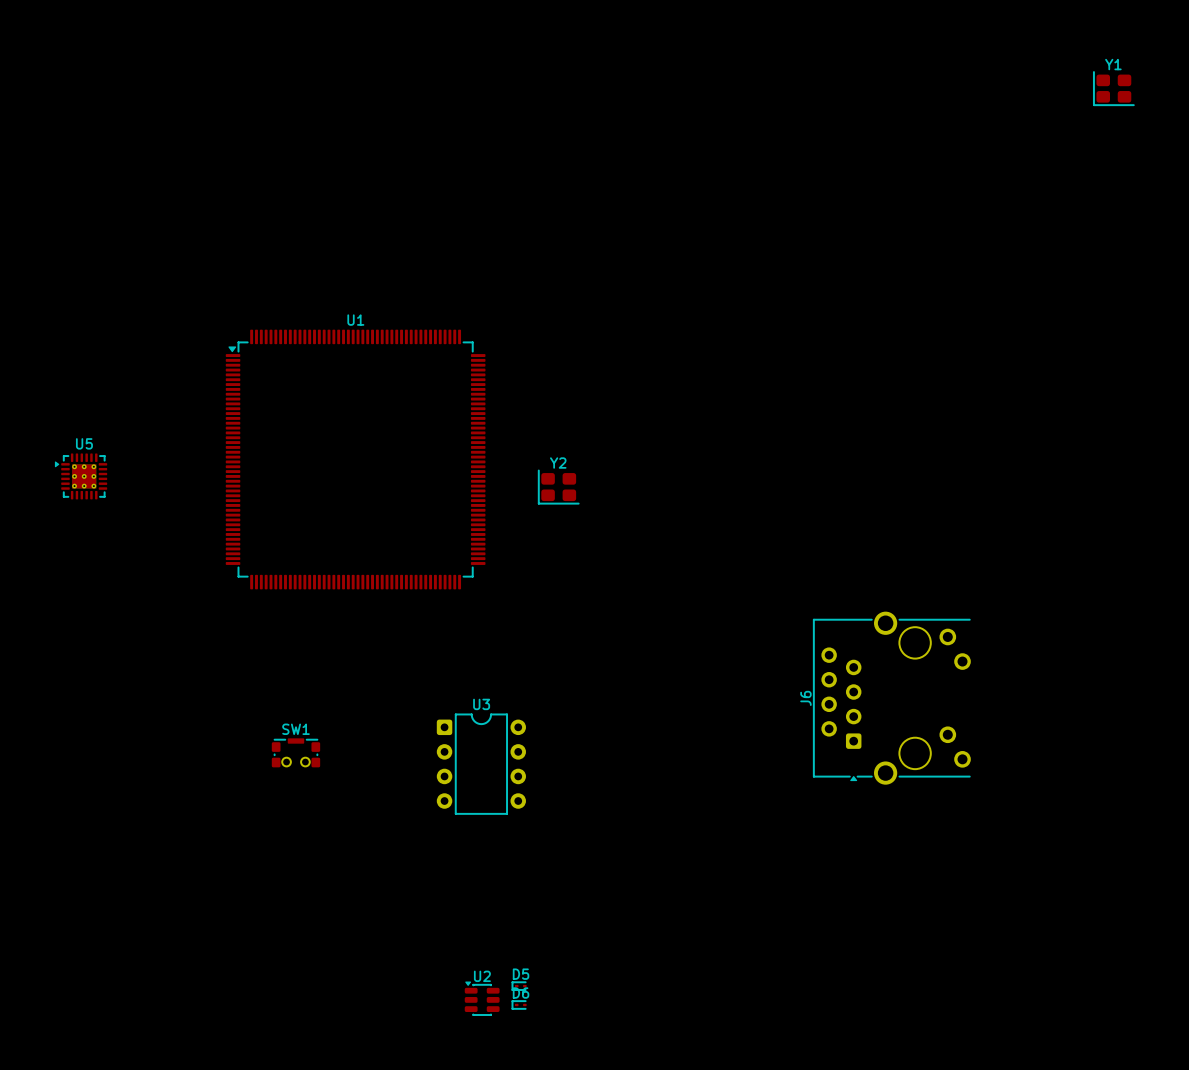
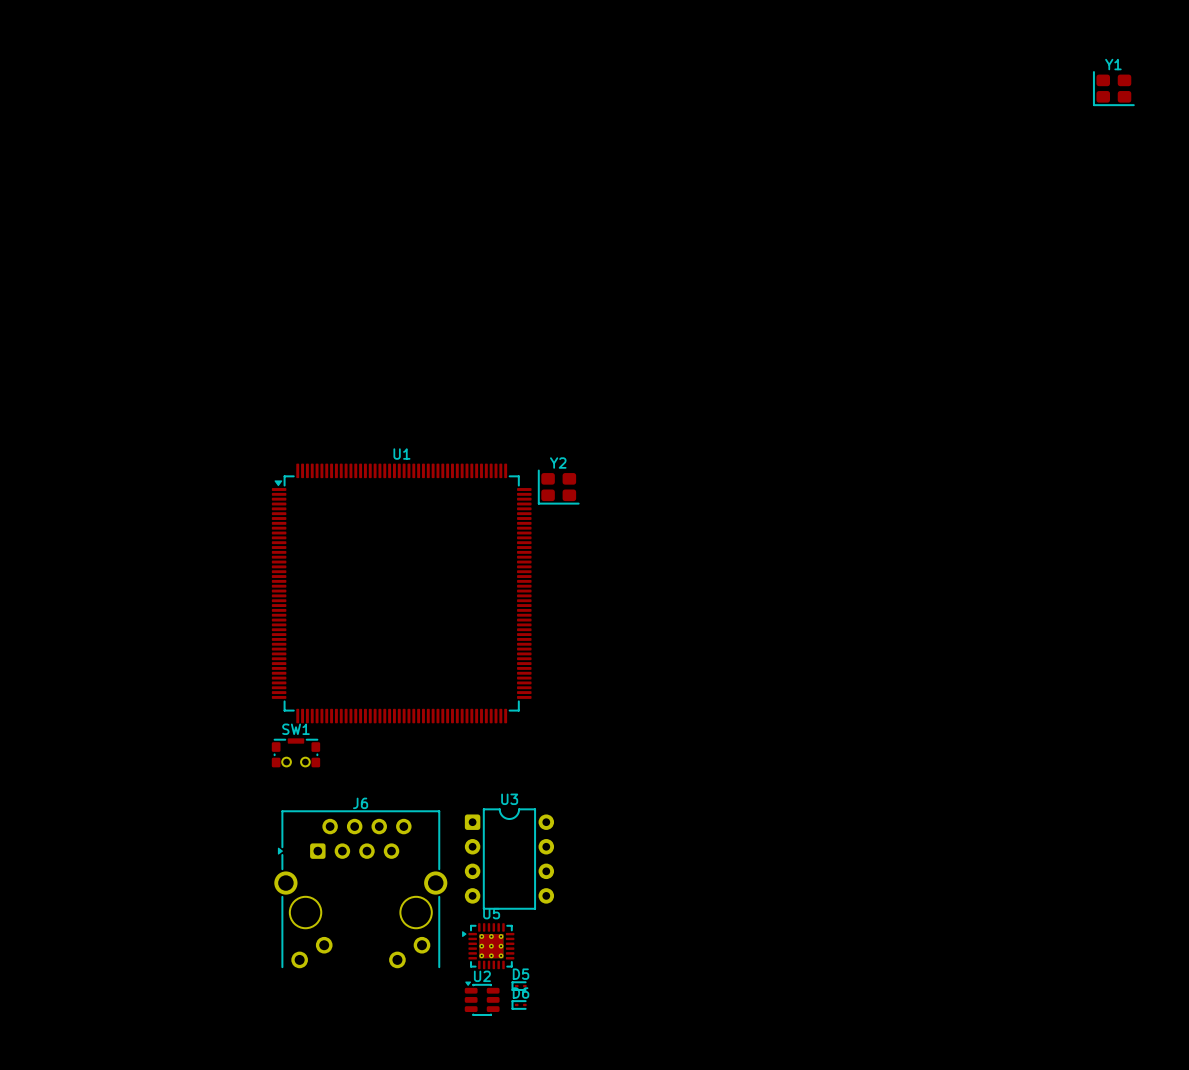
U1 position: (355, 459) -> (401, 593)
U5 position: (81, 476) -> (488, 946)
J6 rotation: 0° (892, 698) -> 90° clockwise (360, 889)
J6 position: (892, 698) -> (360, 889)
U3 position: (481, 764) -> (509, 859)

